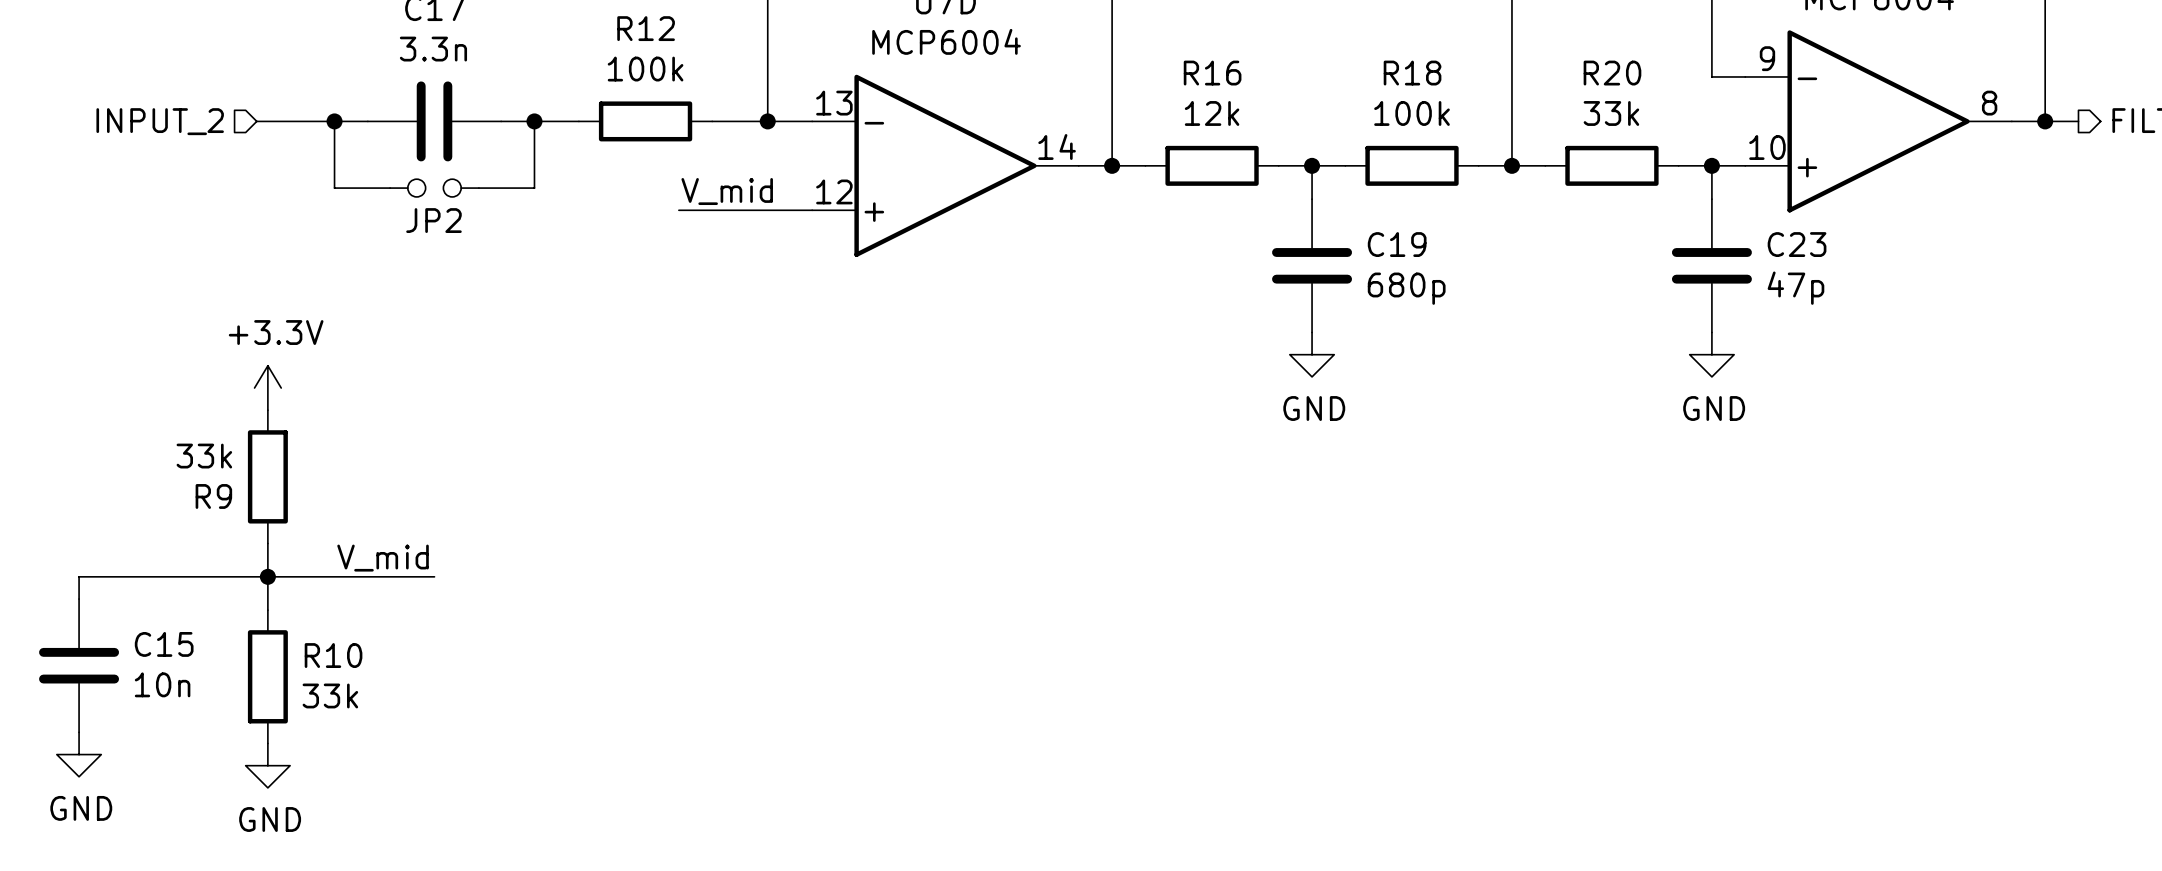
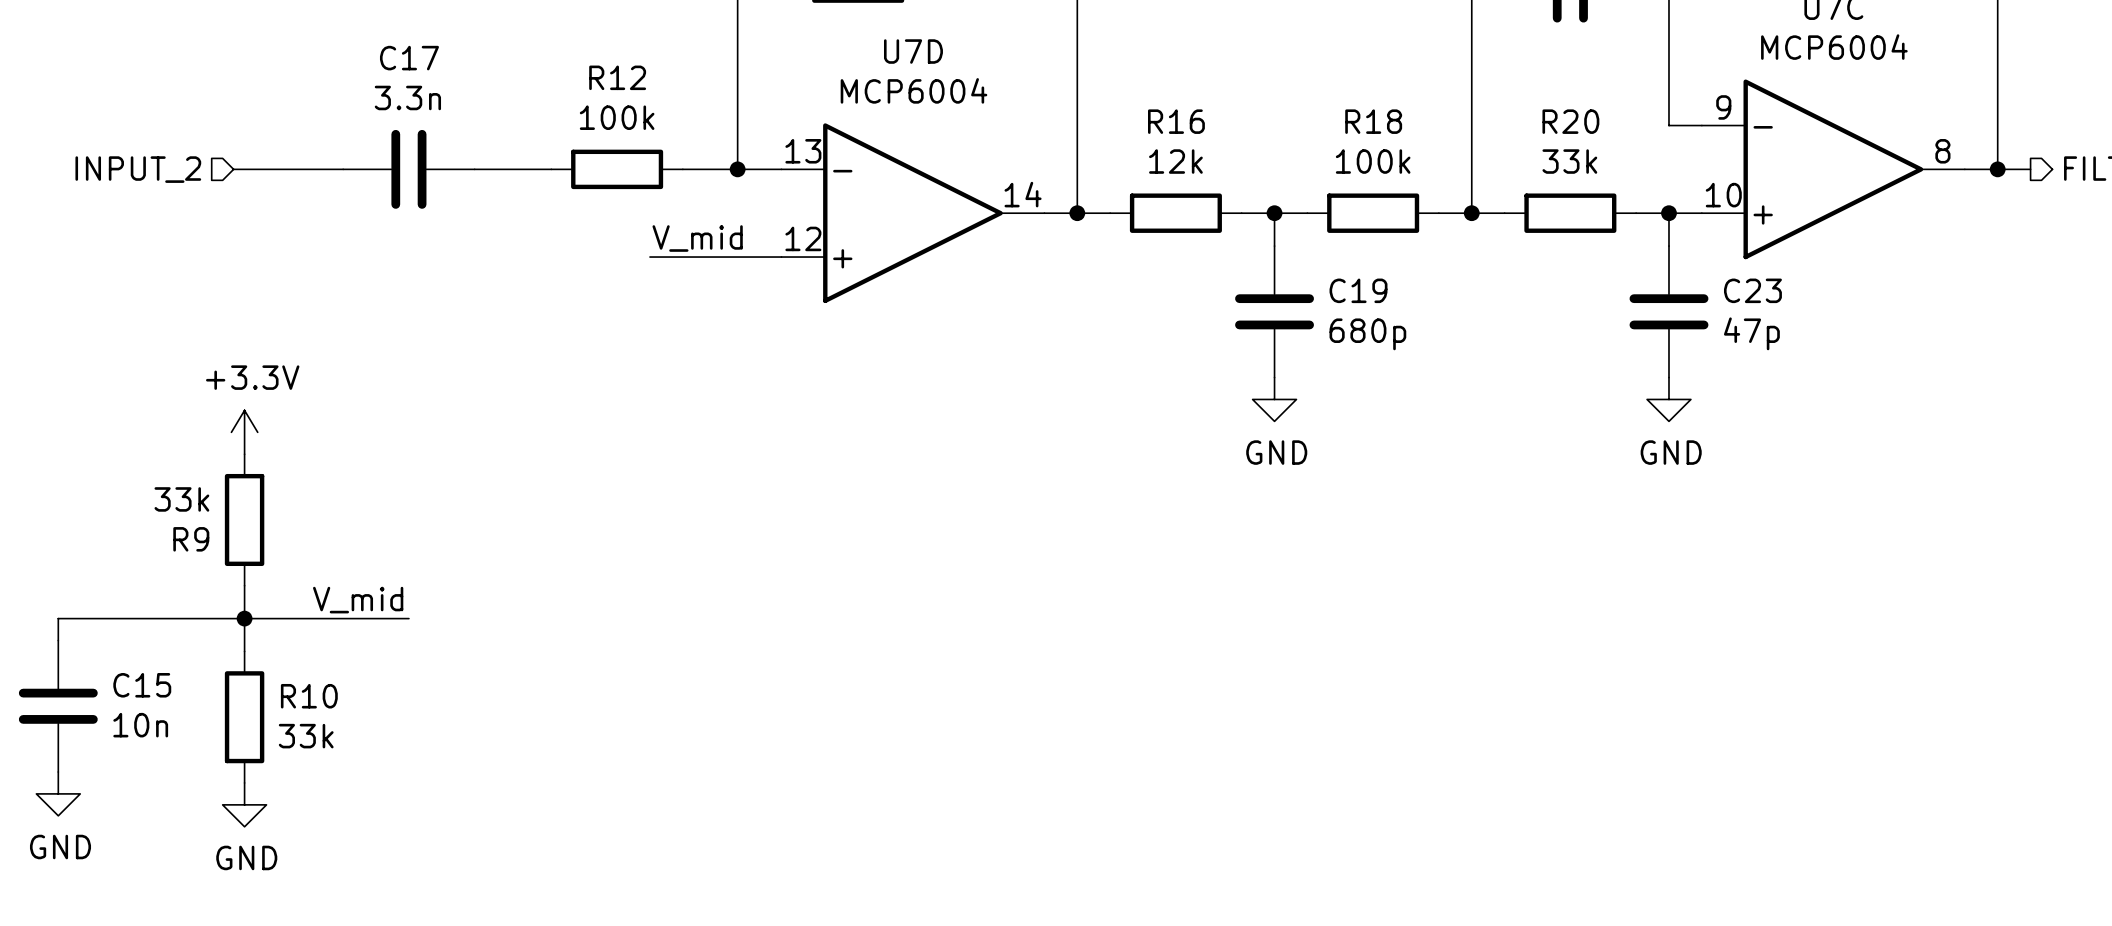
wire: (334, 121) (334, 188) (390, 188) -> none
junction: (334, 121) -> none
wire: (534, 121) (534, 188) (478, 188) -> none
junction: (534, 121) -> none
JP2: (434, 188) -> none

